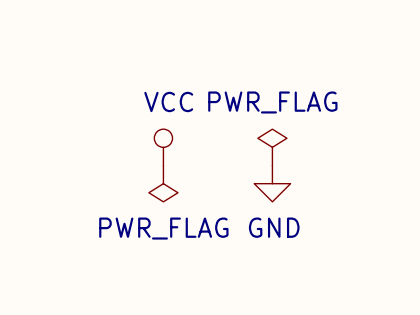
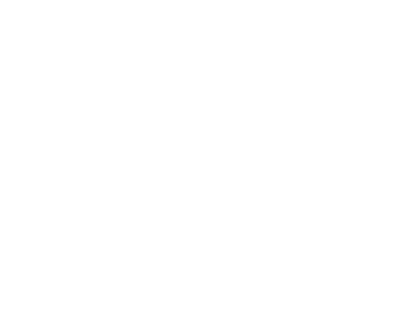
power symbol: VCC (163, 147) -> none
power symbol: PWR_FLAG (272, 147) -> none
power symbol: PWR_FLAG (163, 183) -> none
power symbol: GND (272, 183) -> none

